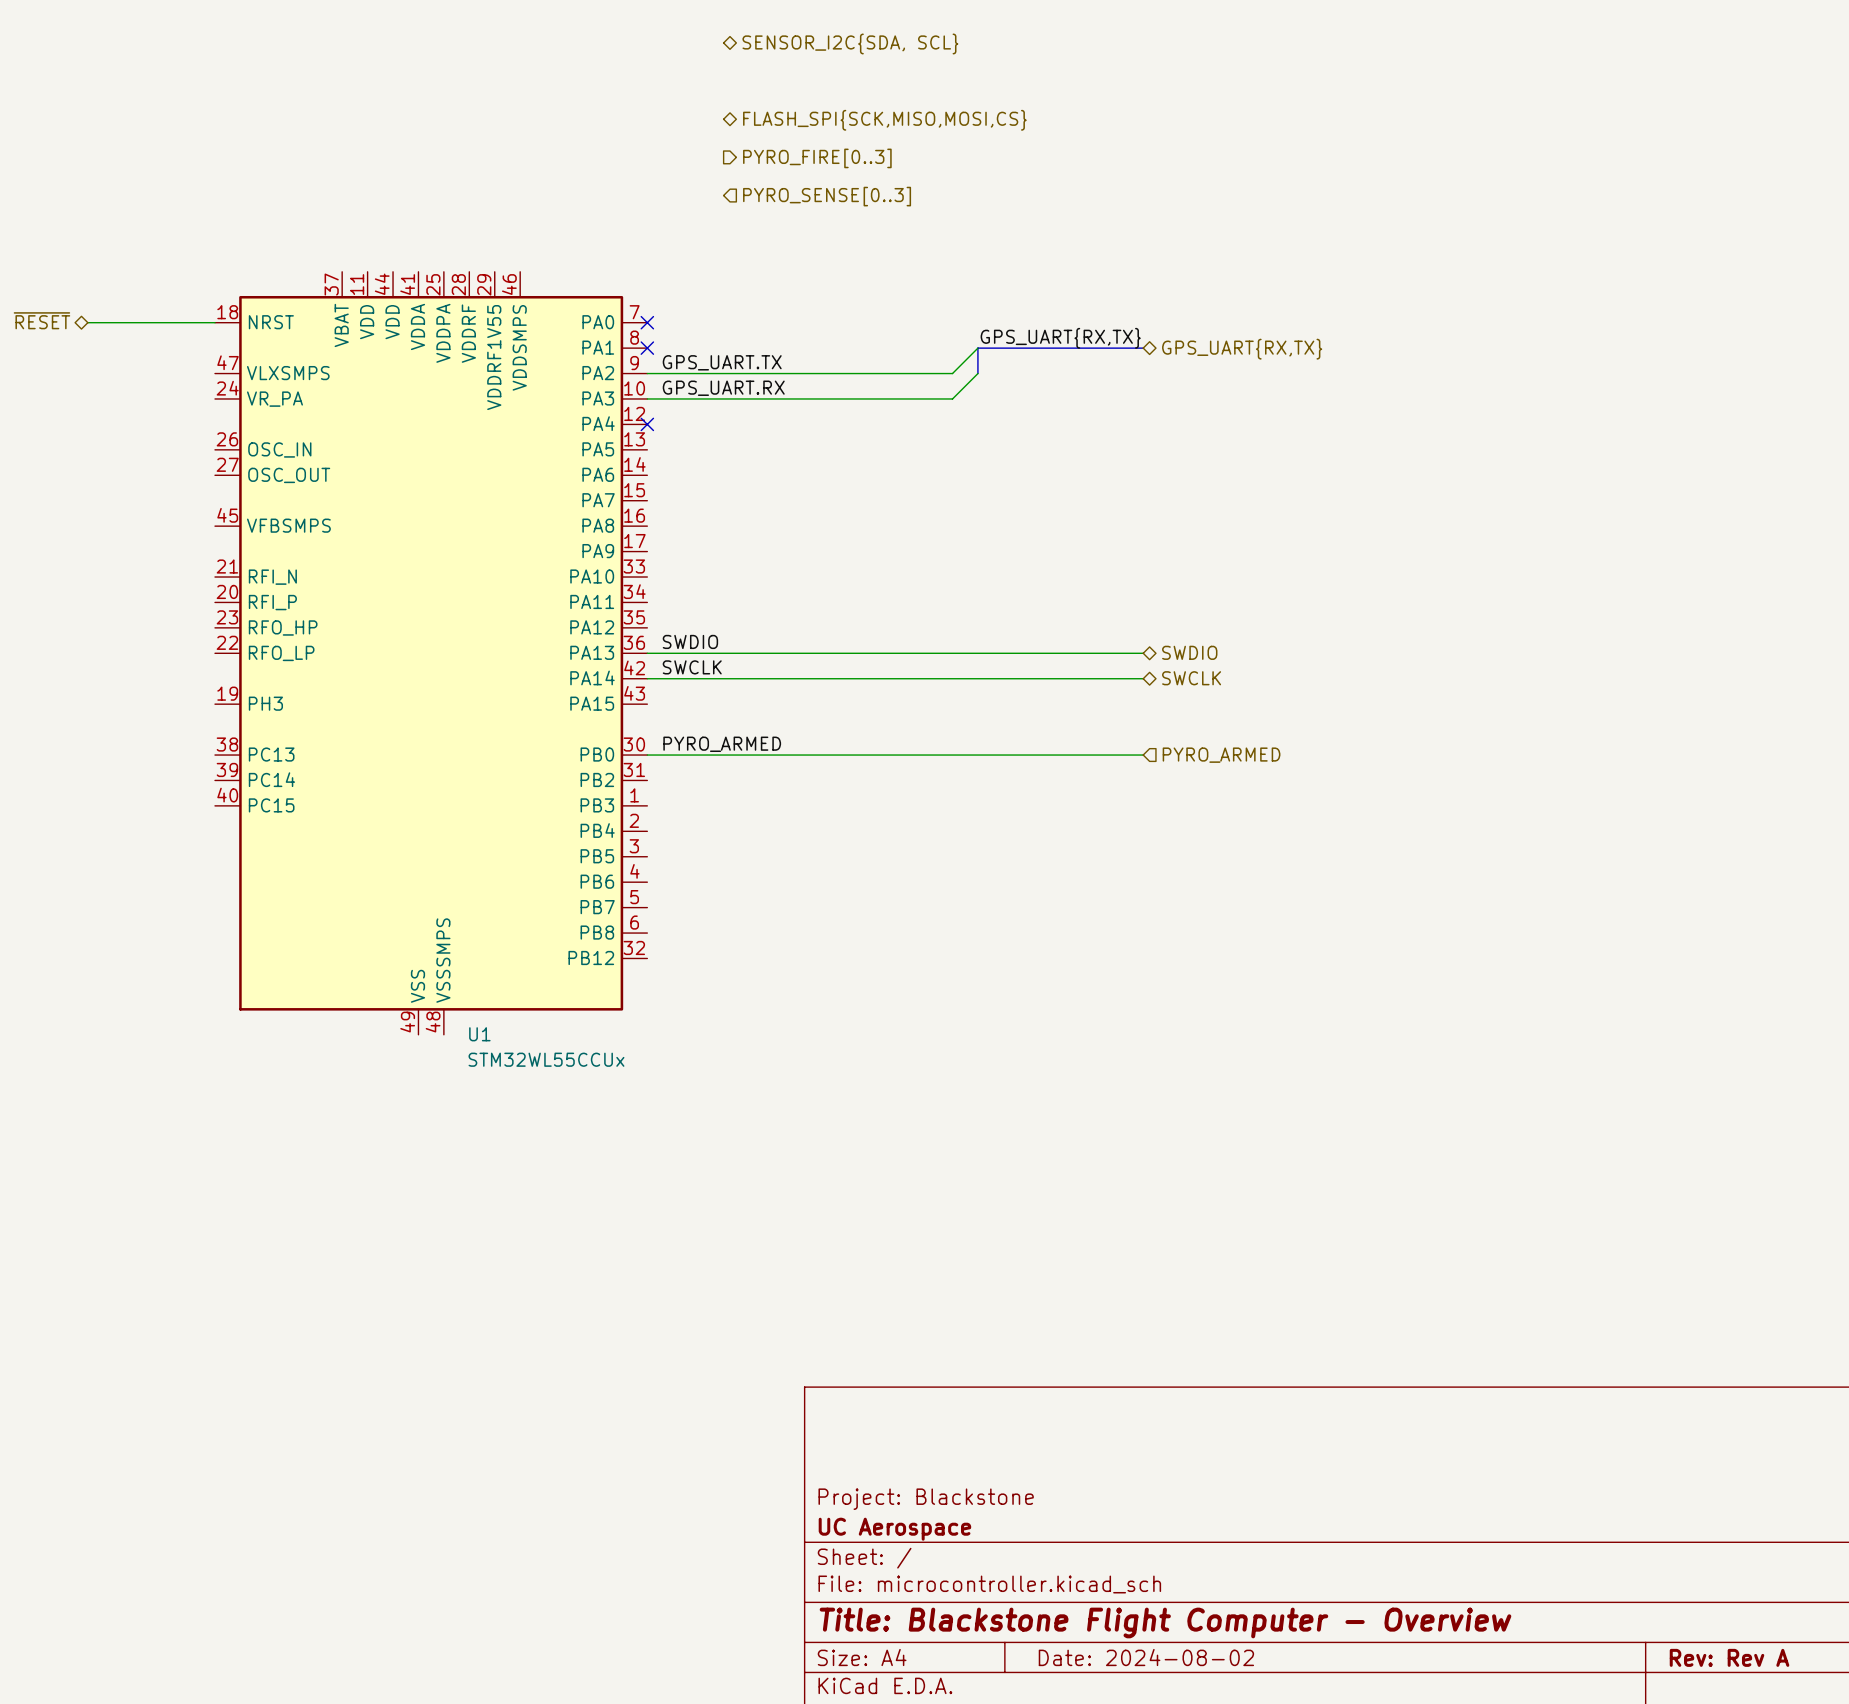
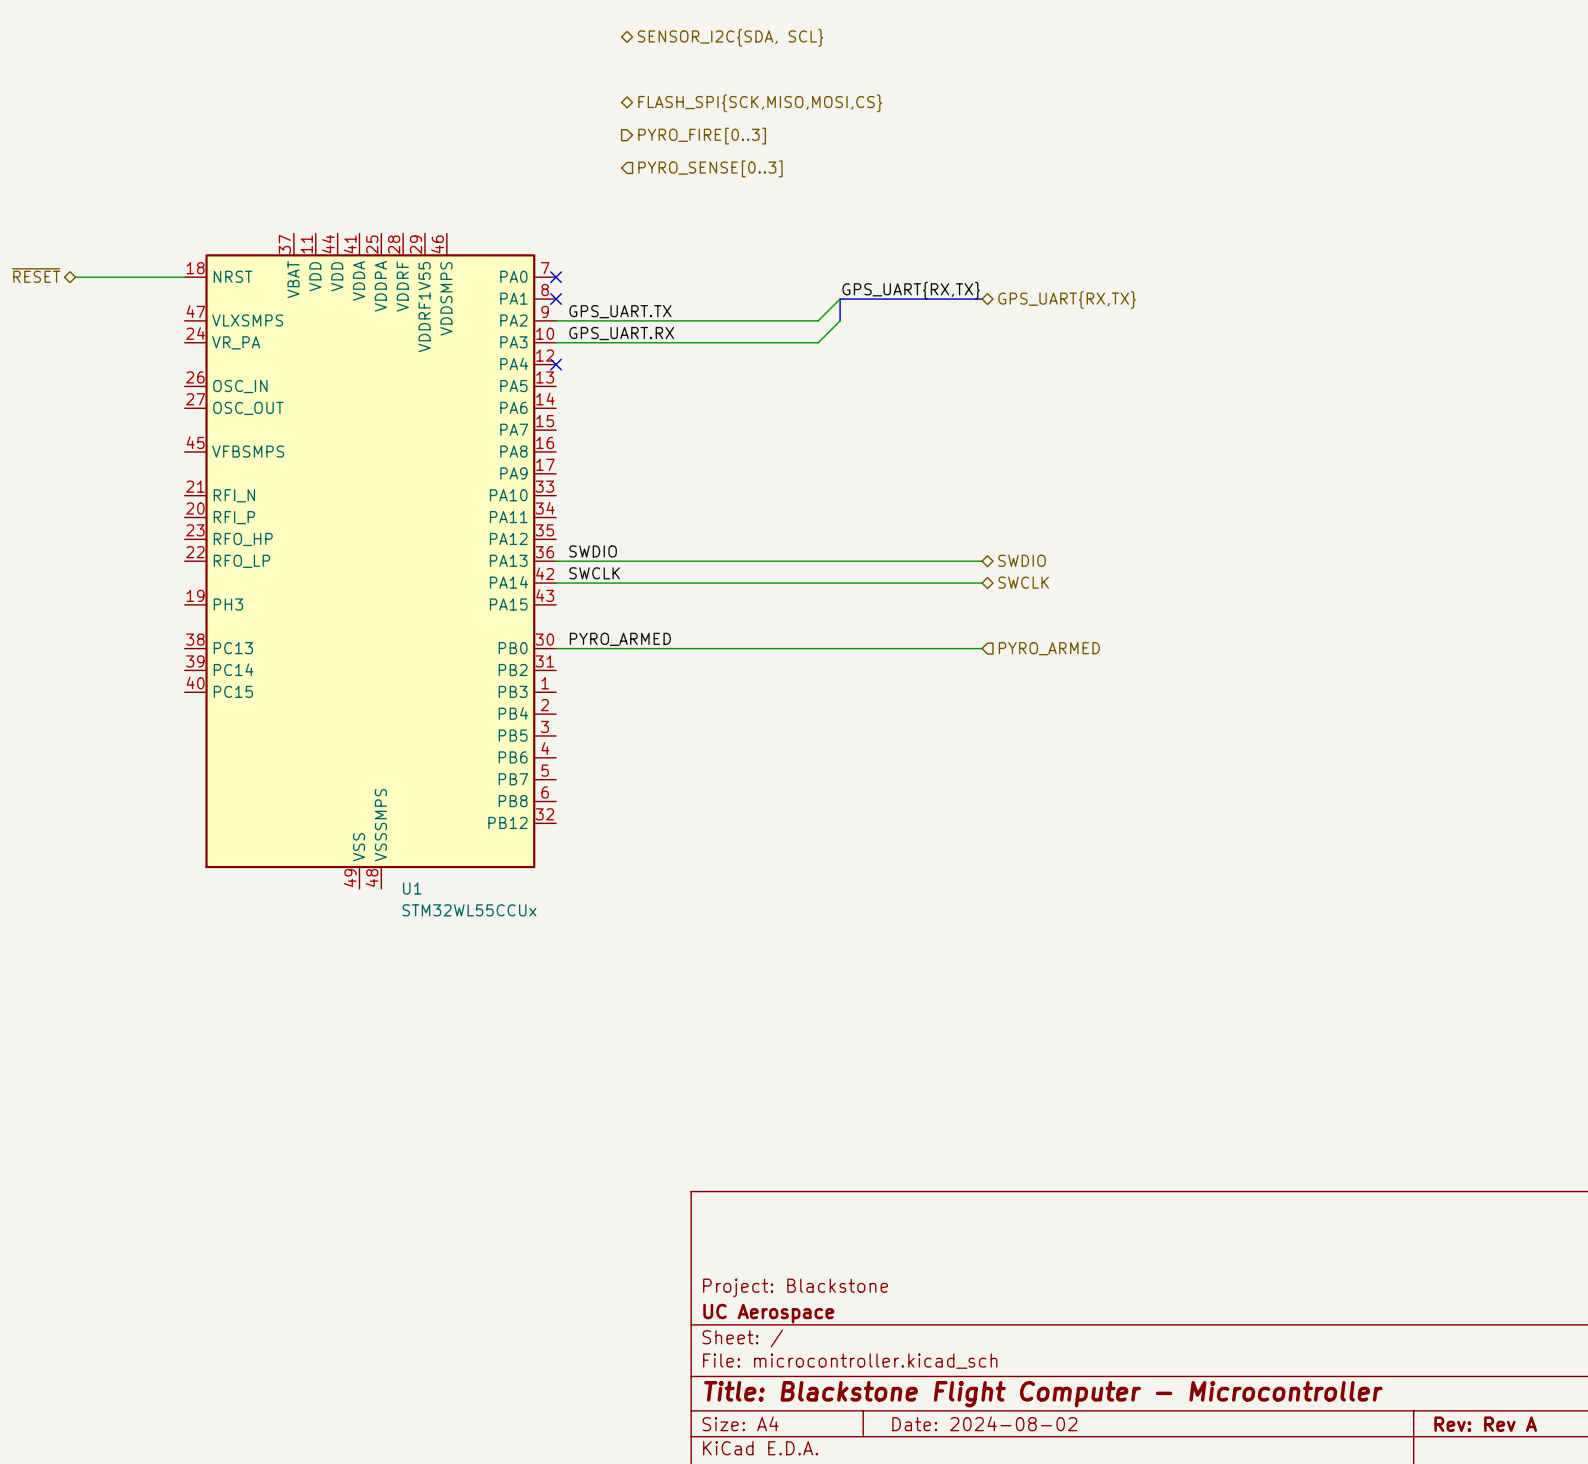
title block: Title: Blackstone Flight Computer - Overview (1165, 1622) -> Title: Blackstone Flight Computer - Microcontroller (1043, 1394)

